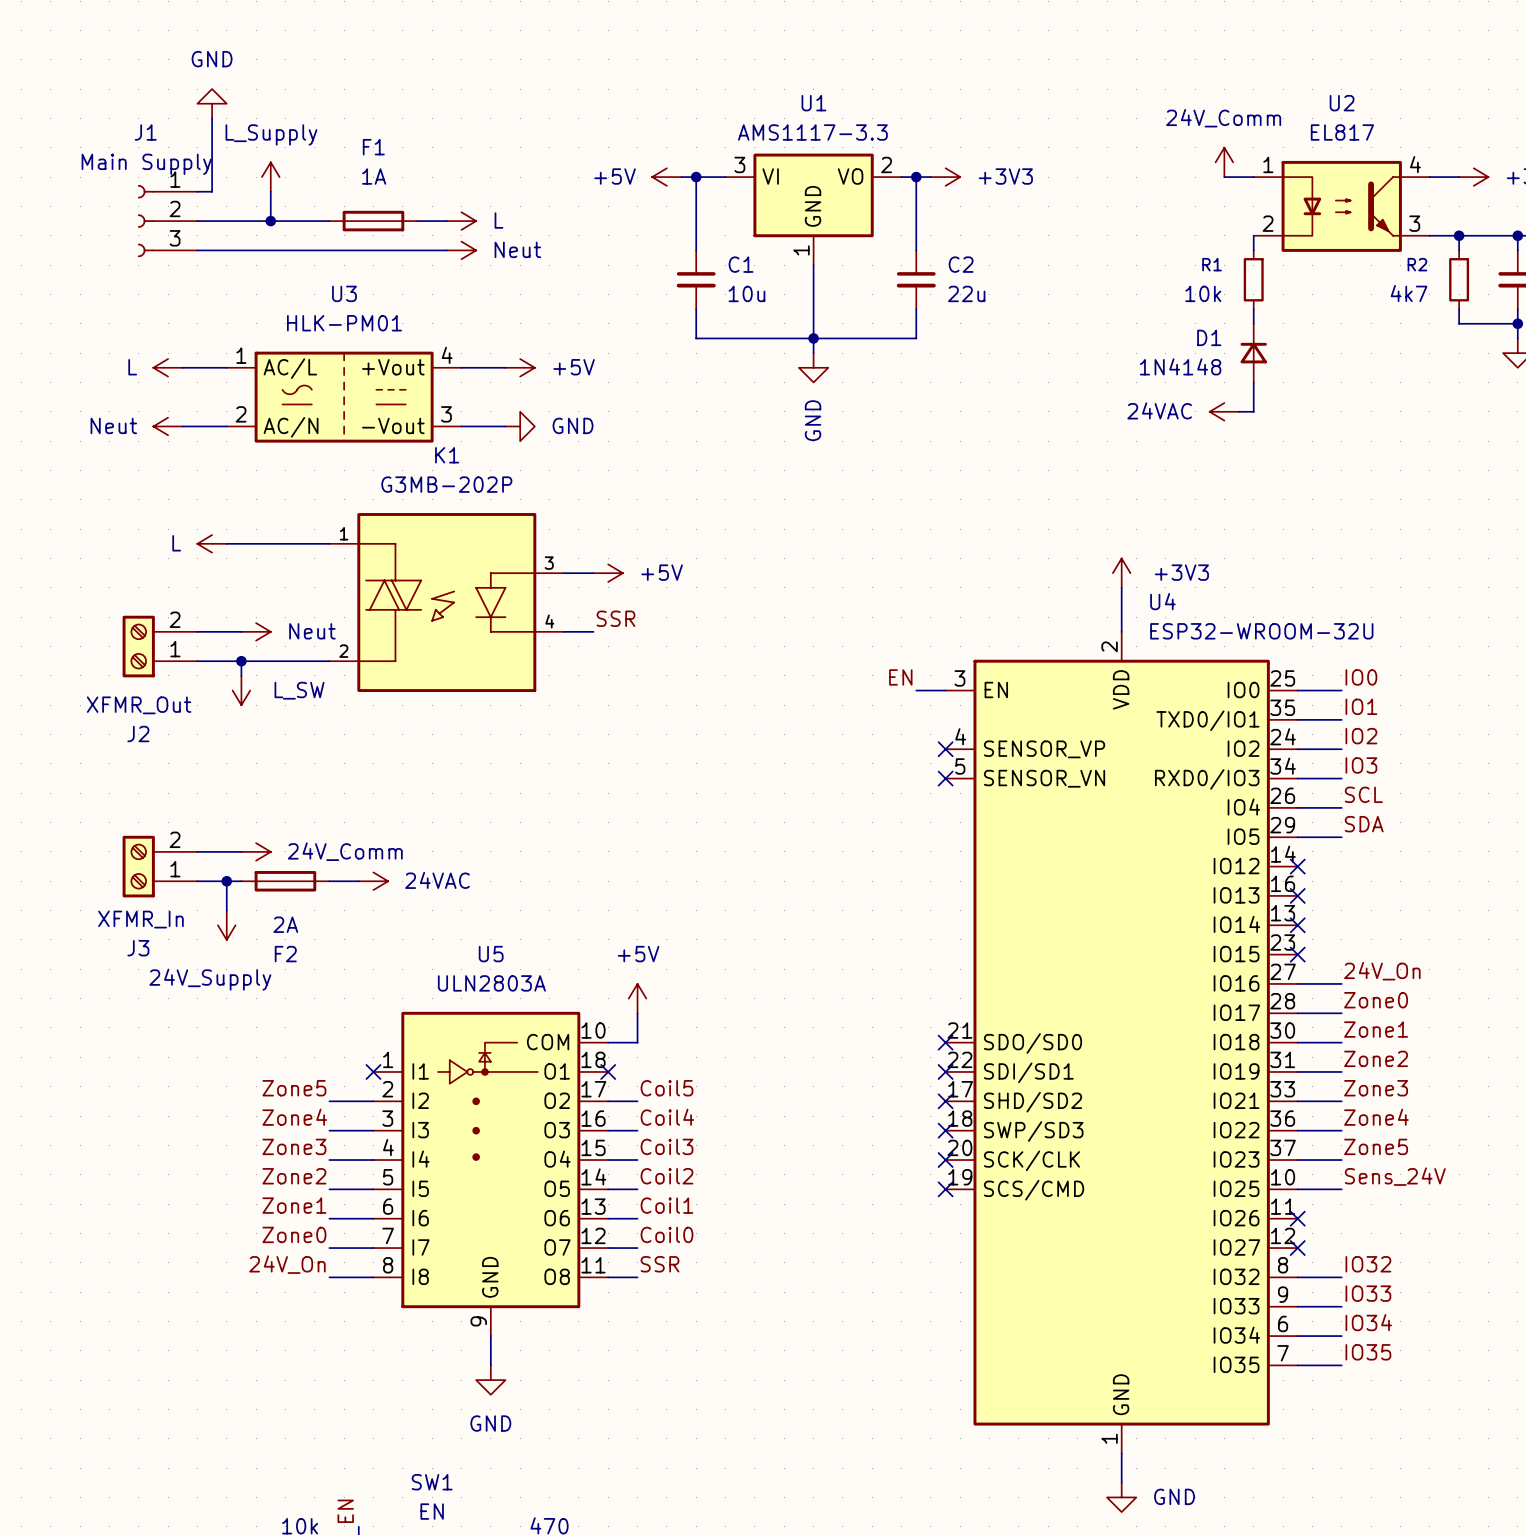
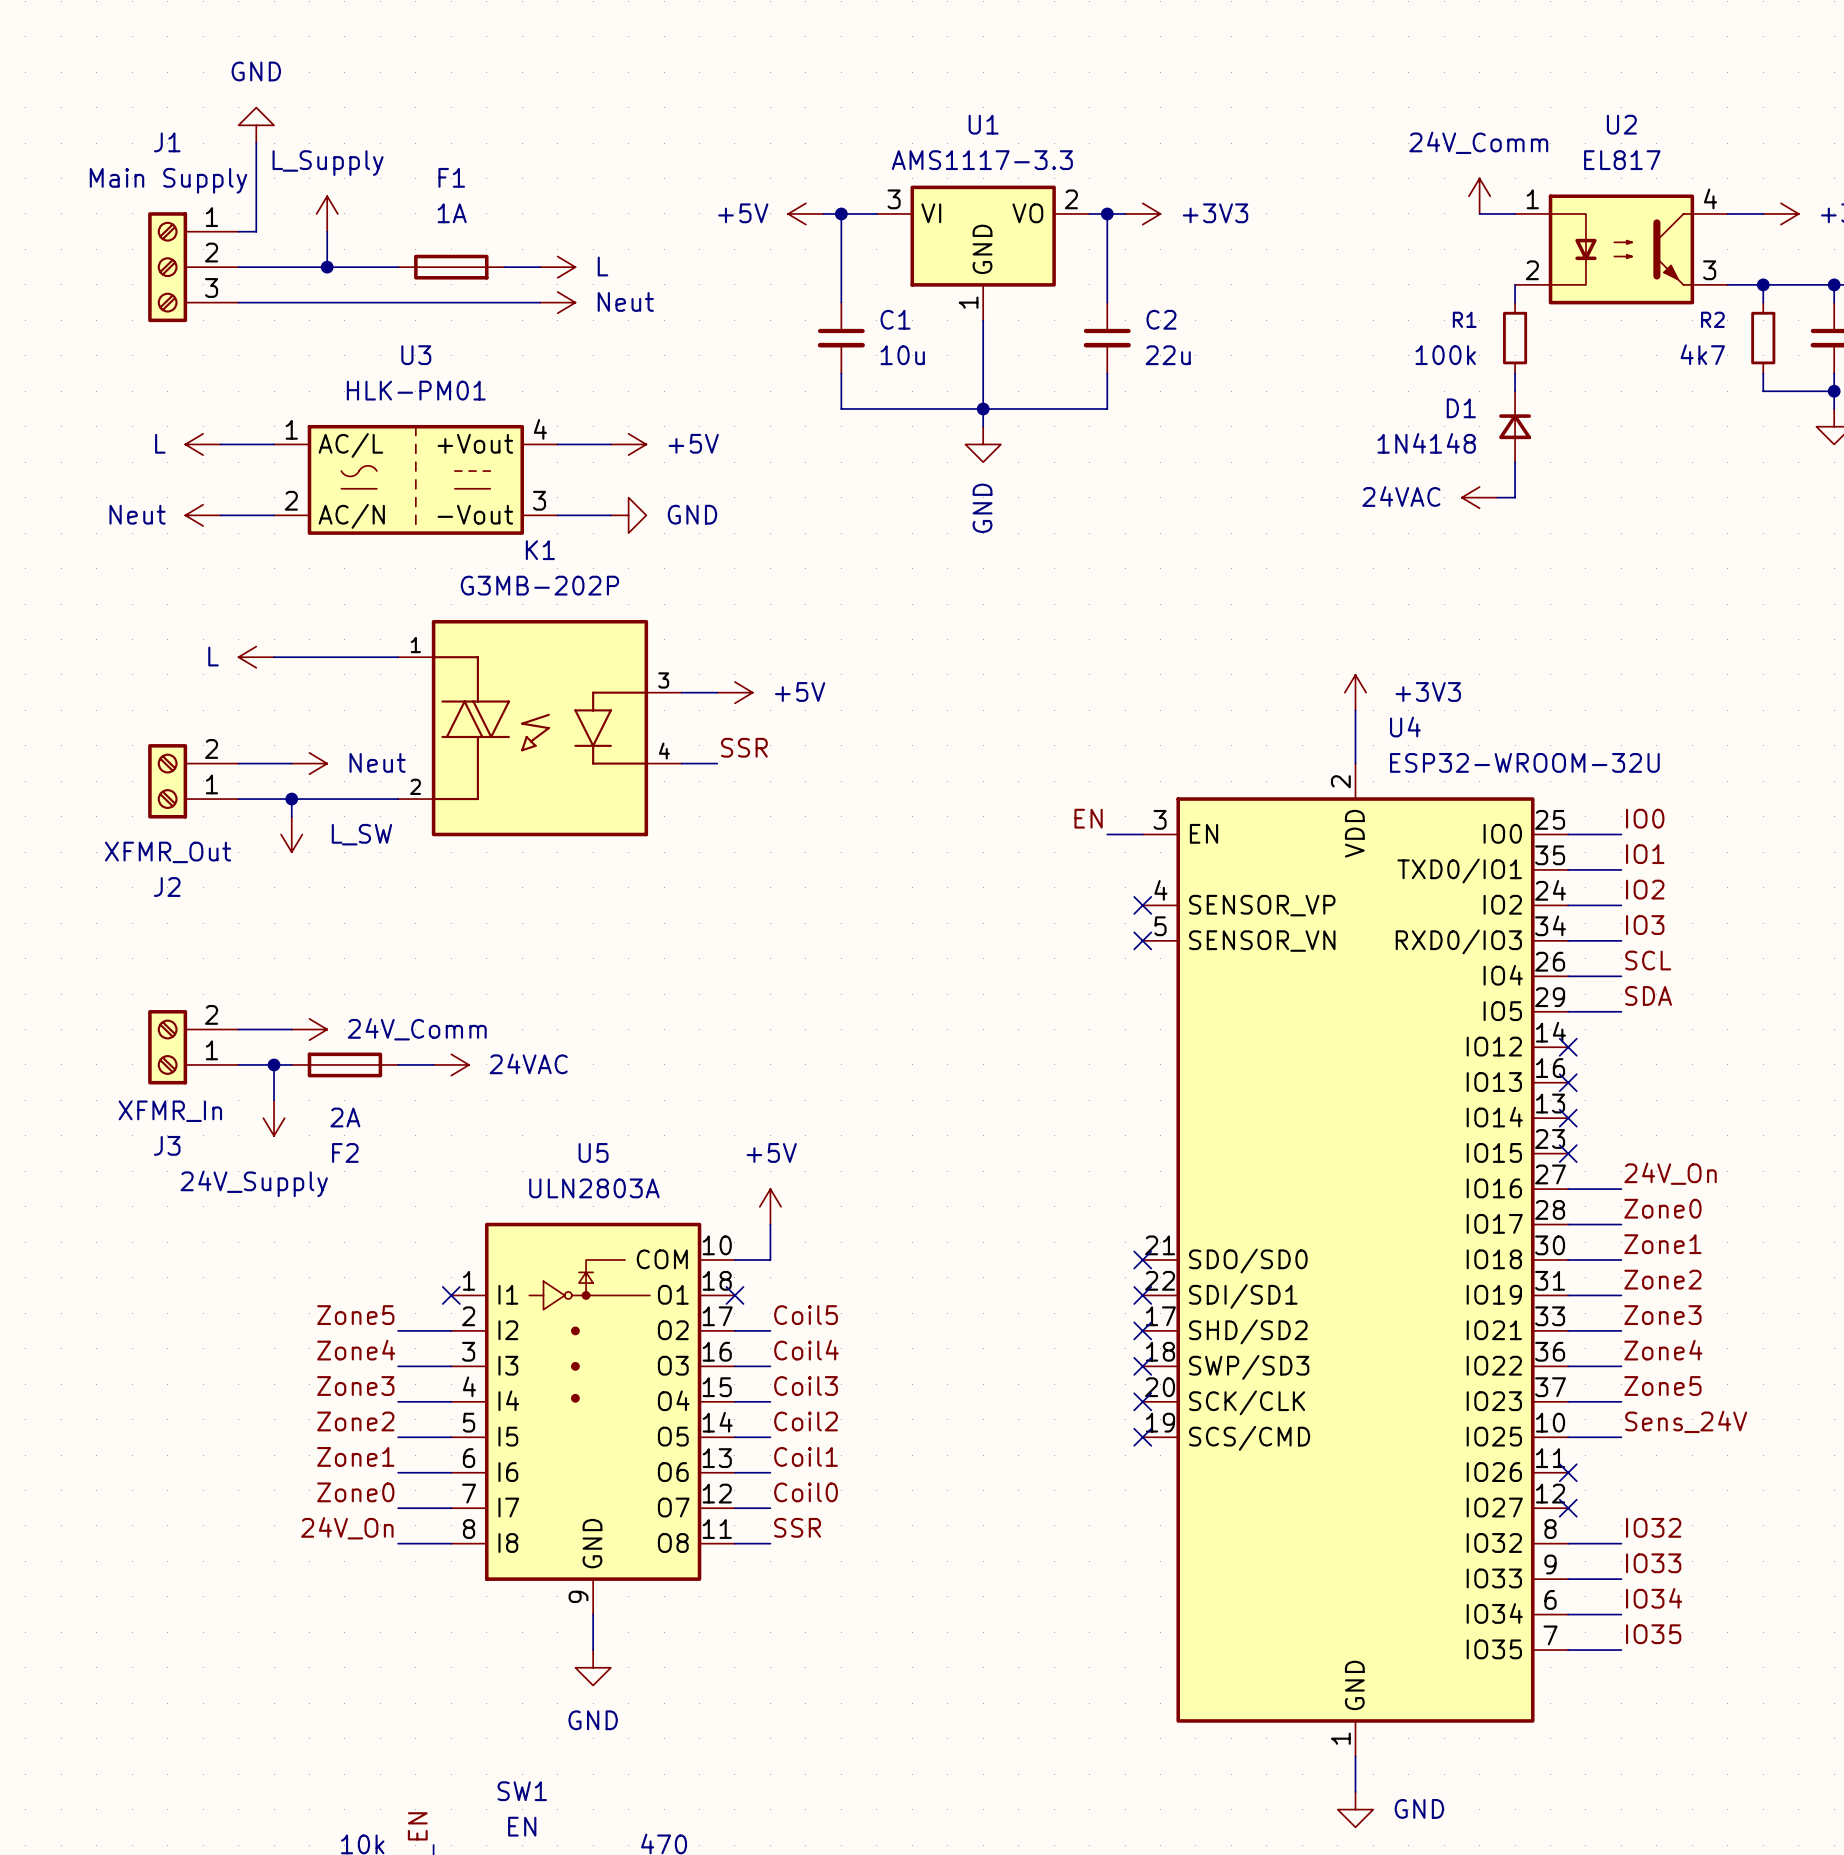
J1 symbol: [137, 184, 198, 258] -> [148, 212, 239, 323]
R1 value: 10k (1203, 293) -> 100k (1445, 355)

